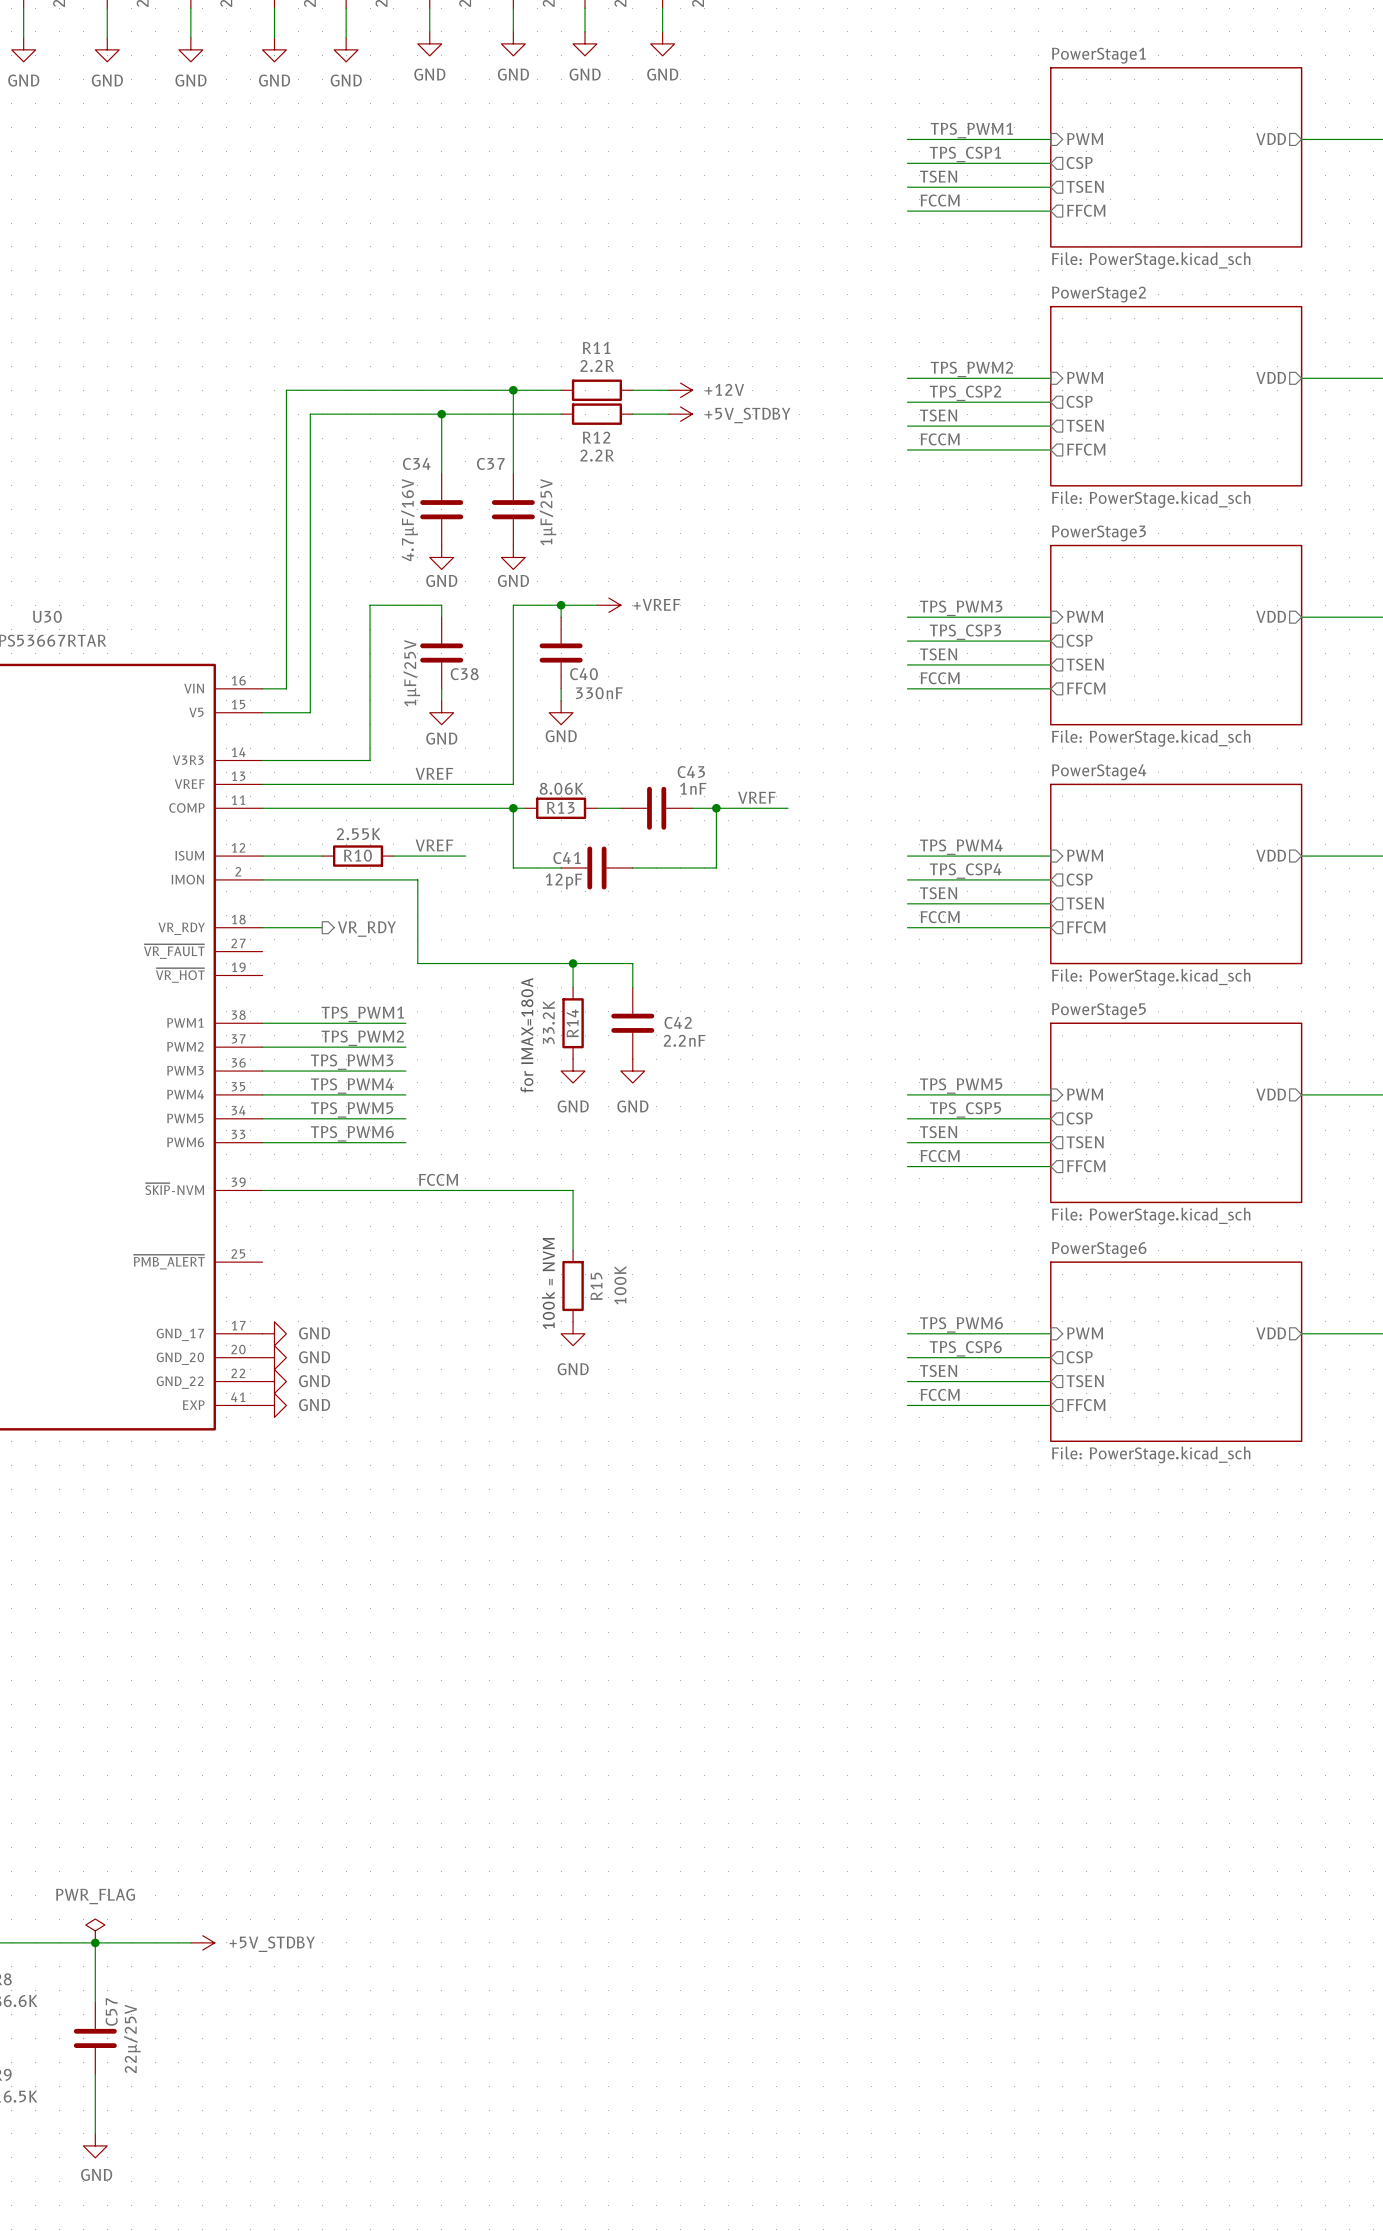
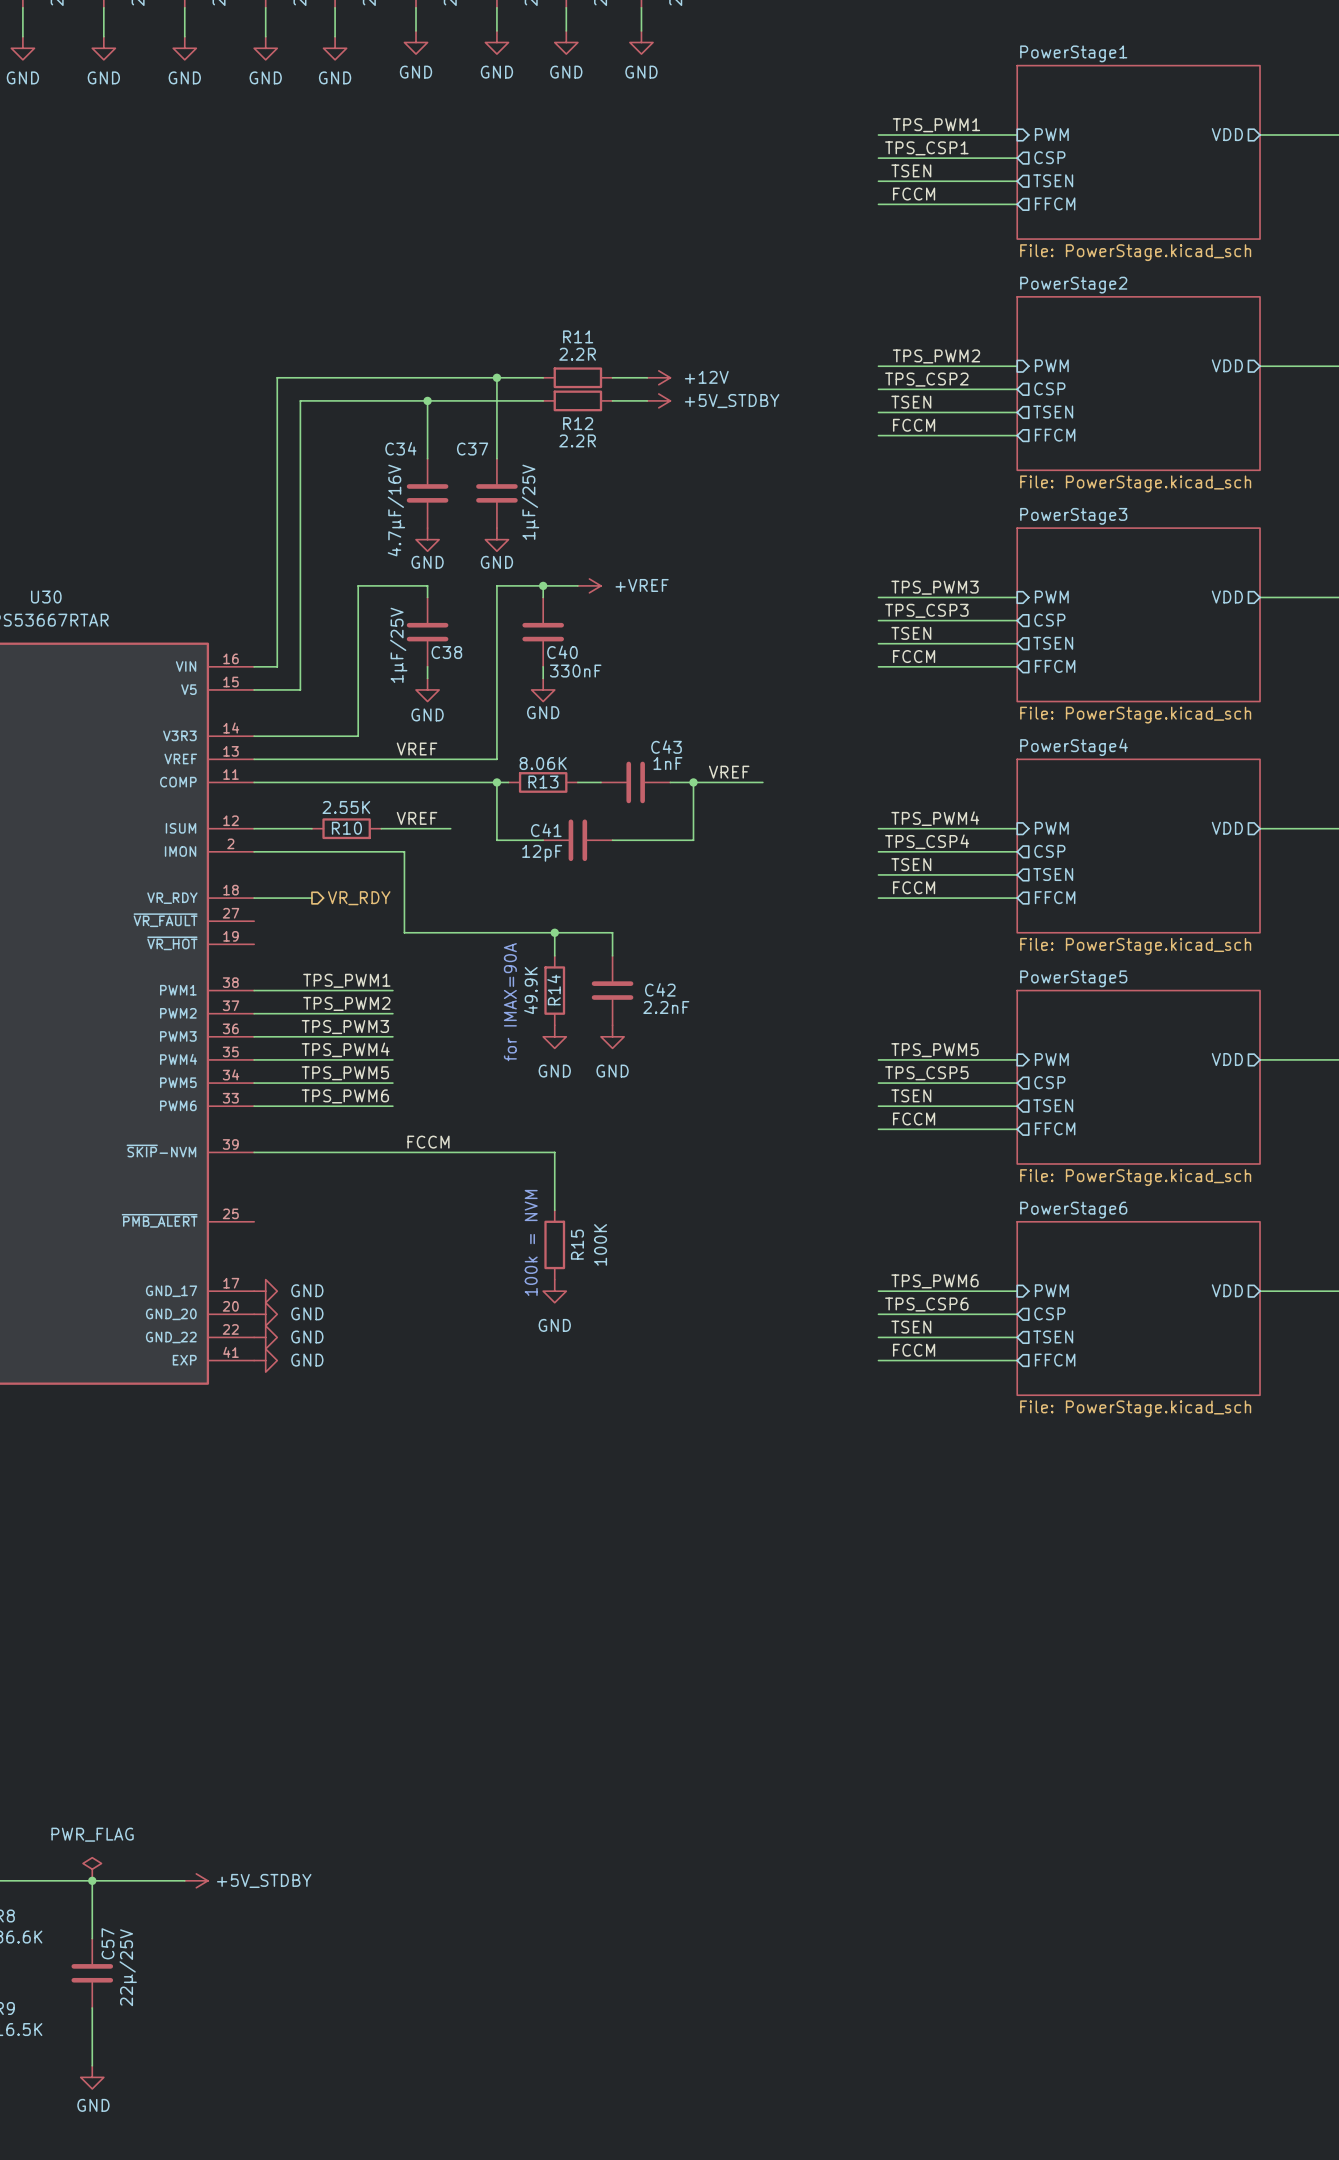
R14 value: 33.2K (548, 1022) -> 49.9K (530, 990)
text: for IMAX=180A (526, 1035) -> for IMAX=90A (510, 1002)

